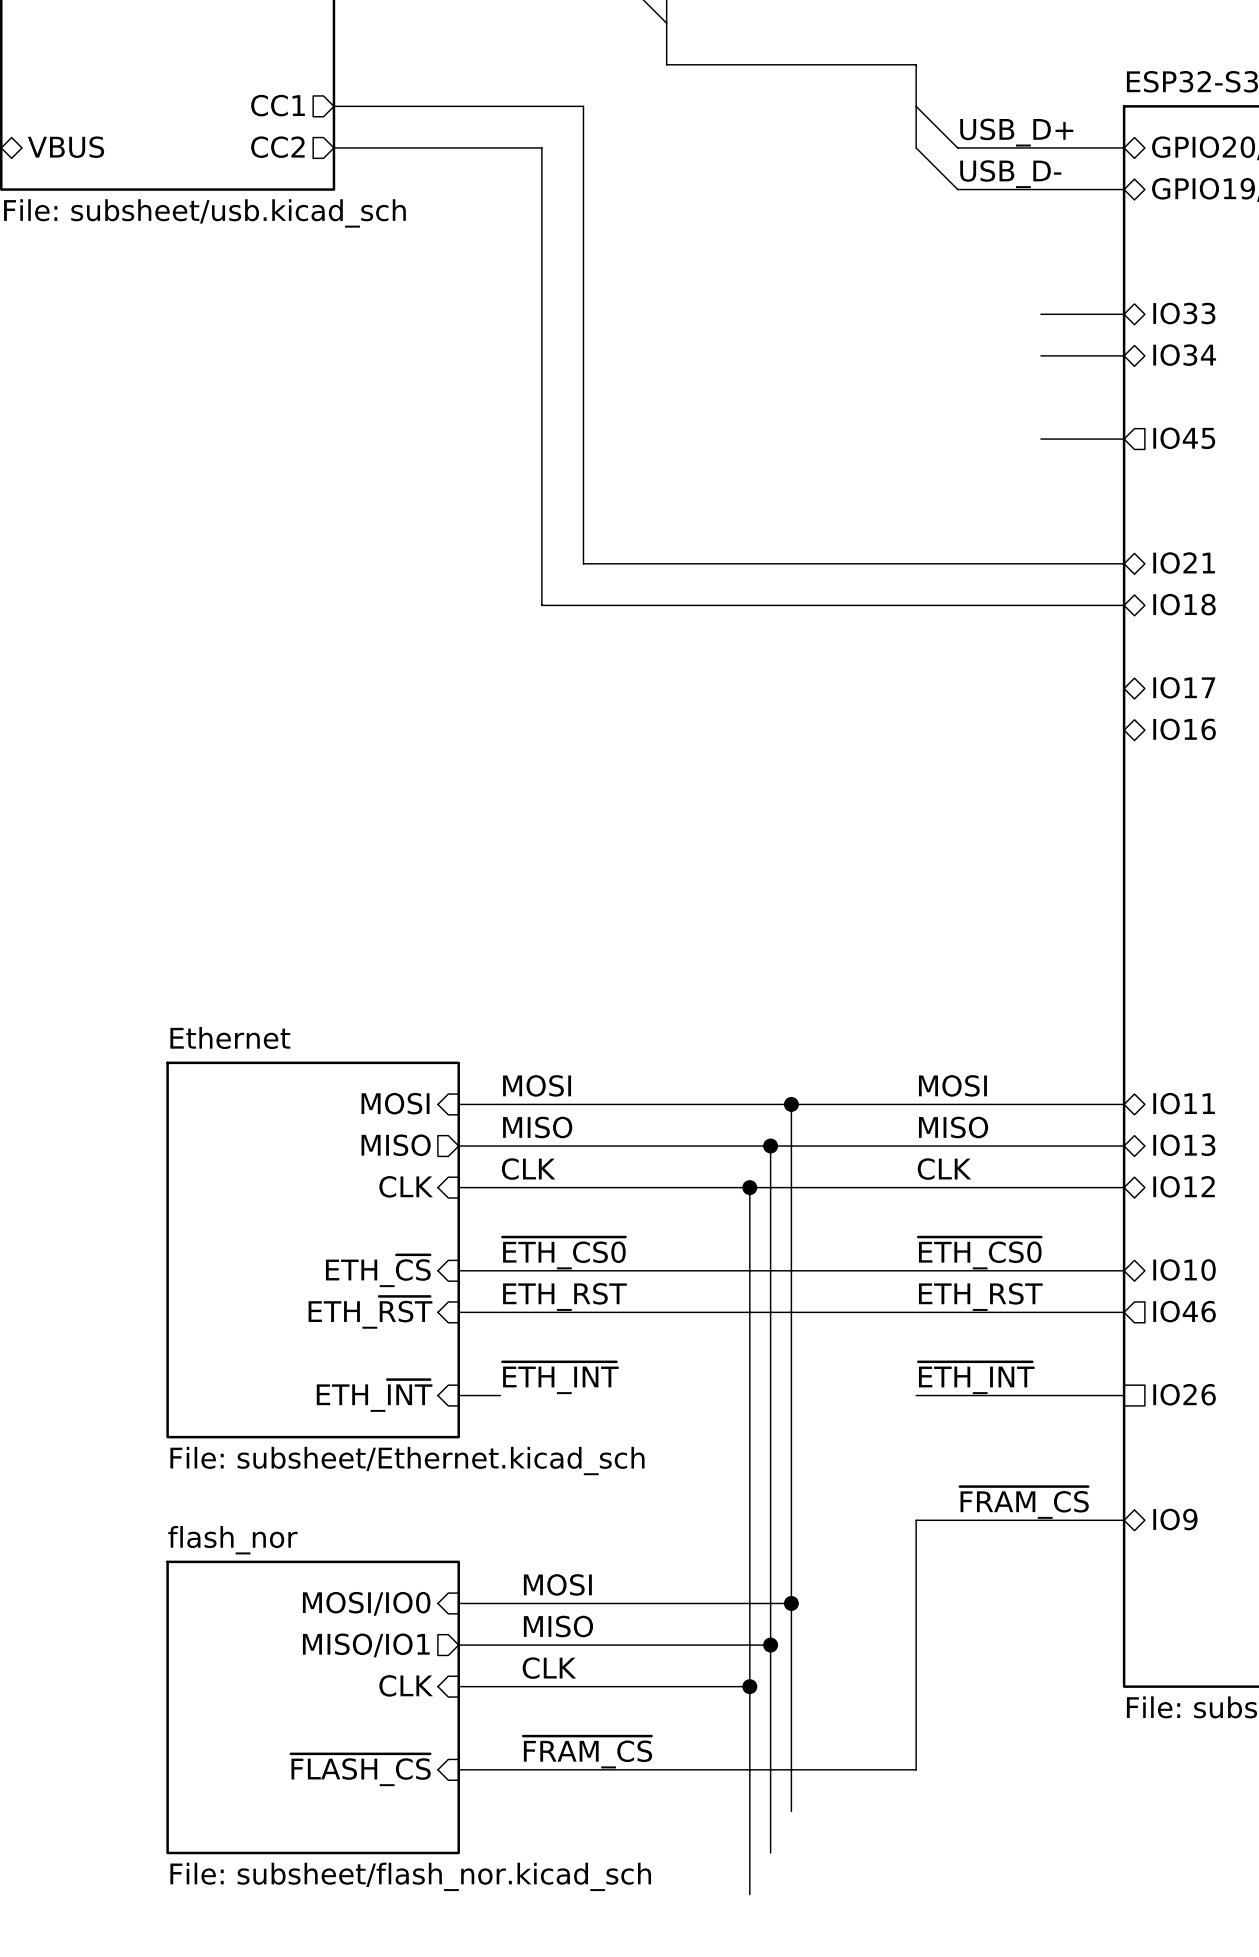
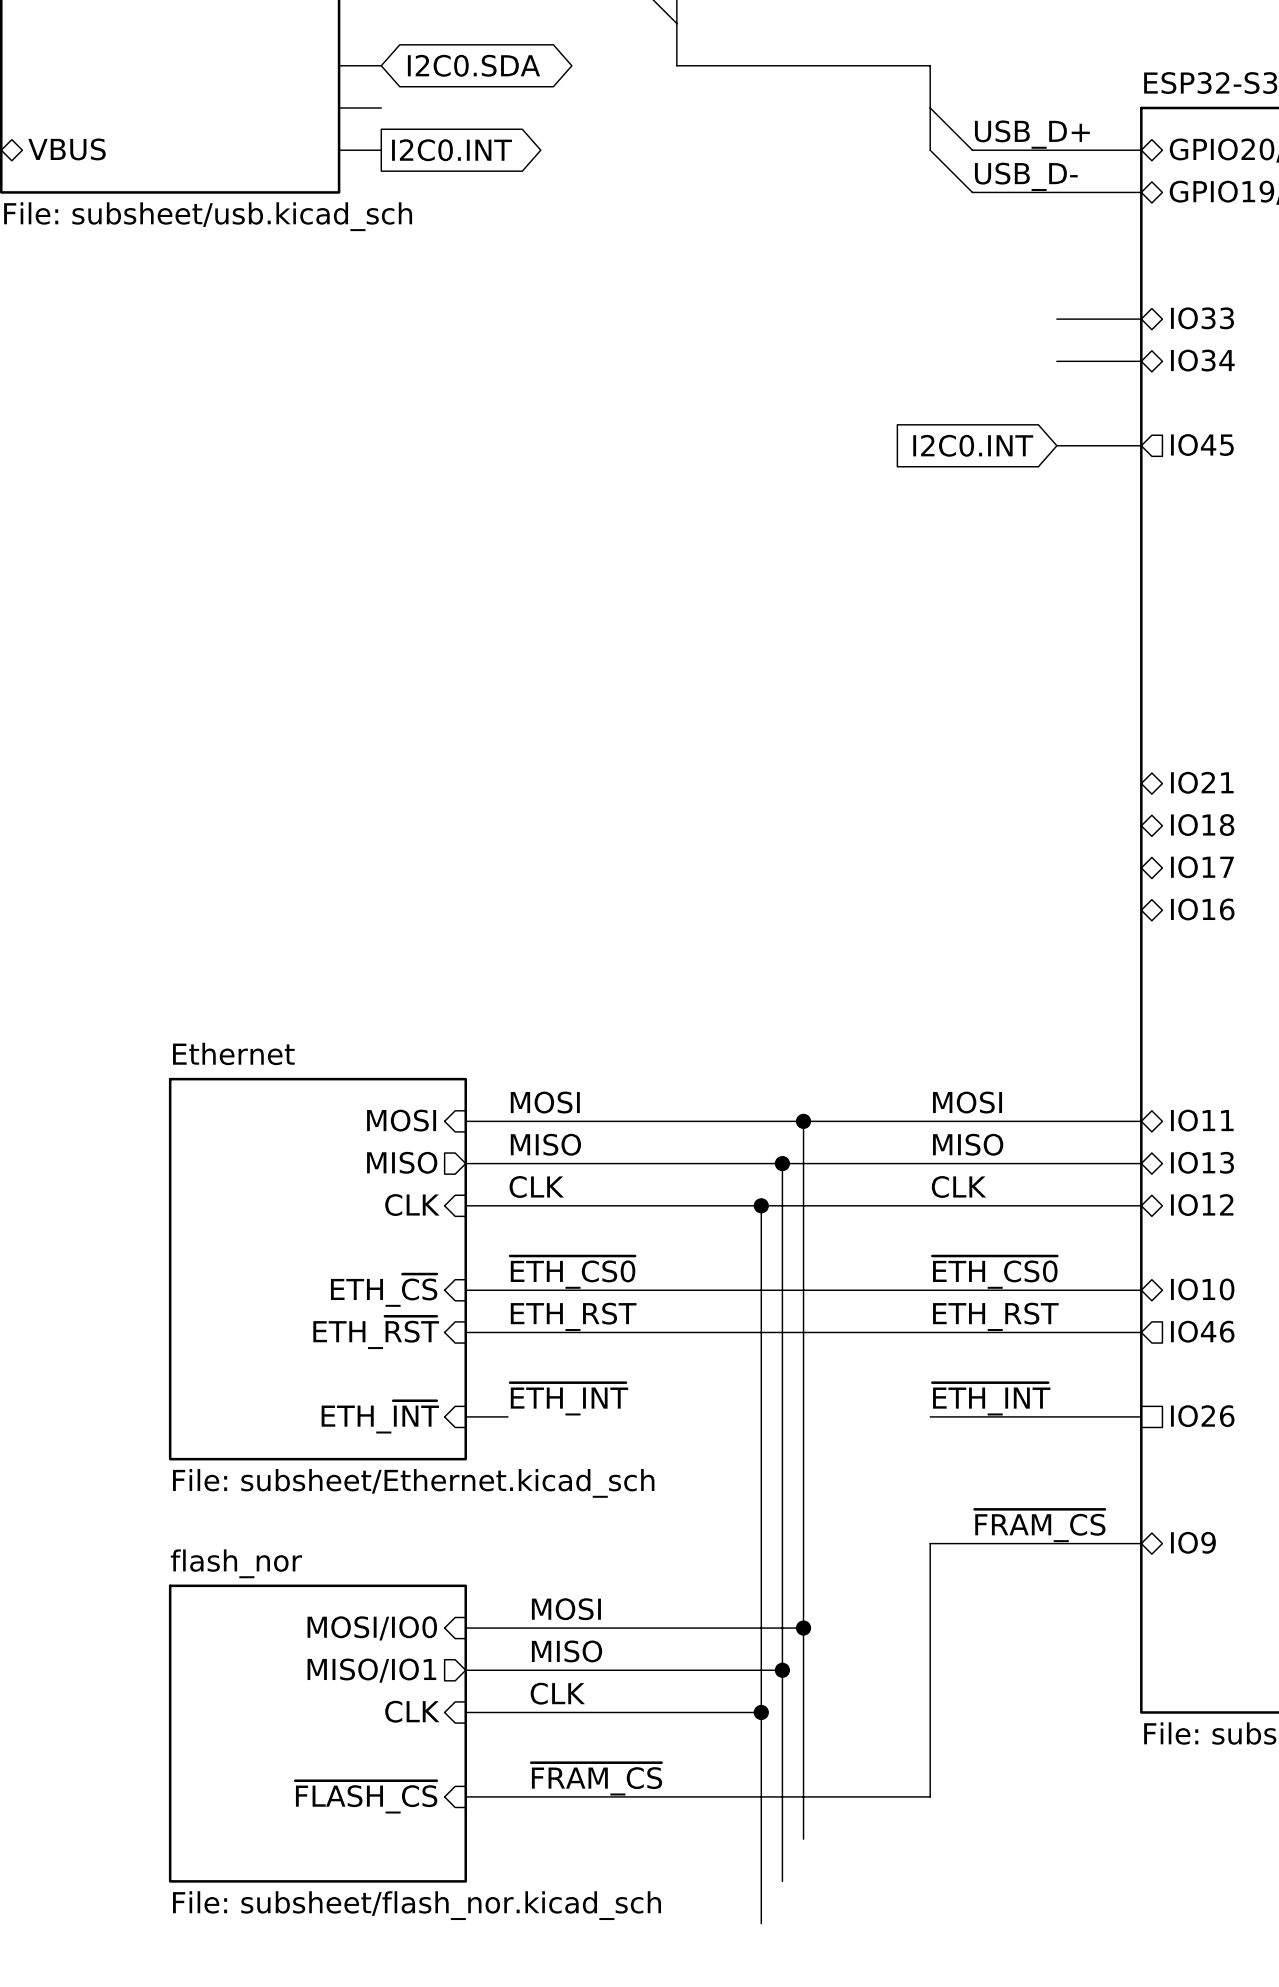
wire: none -> (339, 65) (381, 65)
global label: none -> I2C0.SDA (473, 65)
sheet pin: CC1 (278, 105) -> none
wire: (375, 106) (583, 106) (583, 563) (1124, 563) -> none
sheet pin: CC2 (277, 147) -> none
wire: (375, 147) (541, 147) (541, 605) (1124, 605) -> none
global label: none -> I2C0.INT (452, 150)
global label: none -> I2C0.INT (973, 445)
sheet pin position: IO21 (1184, 563) -> IO21 (1202, 782)
sheet pin position: IO18 (1184, 604) -> IO18 (1202, 825)
sheet pin position: IO17 (1184, 687) -> IO17 (1202, 867)
sheet pin position: IO16 (1184, 729) -> IO16 (1202, 909)

